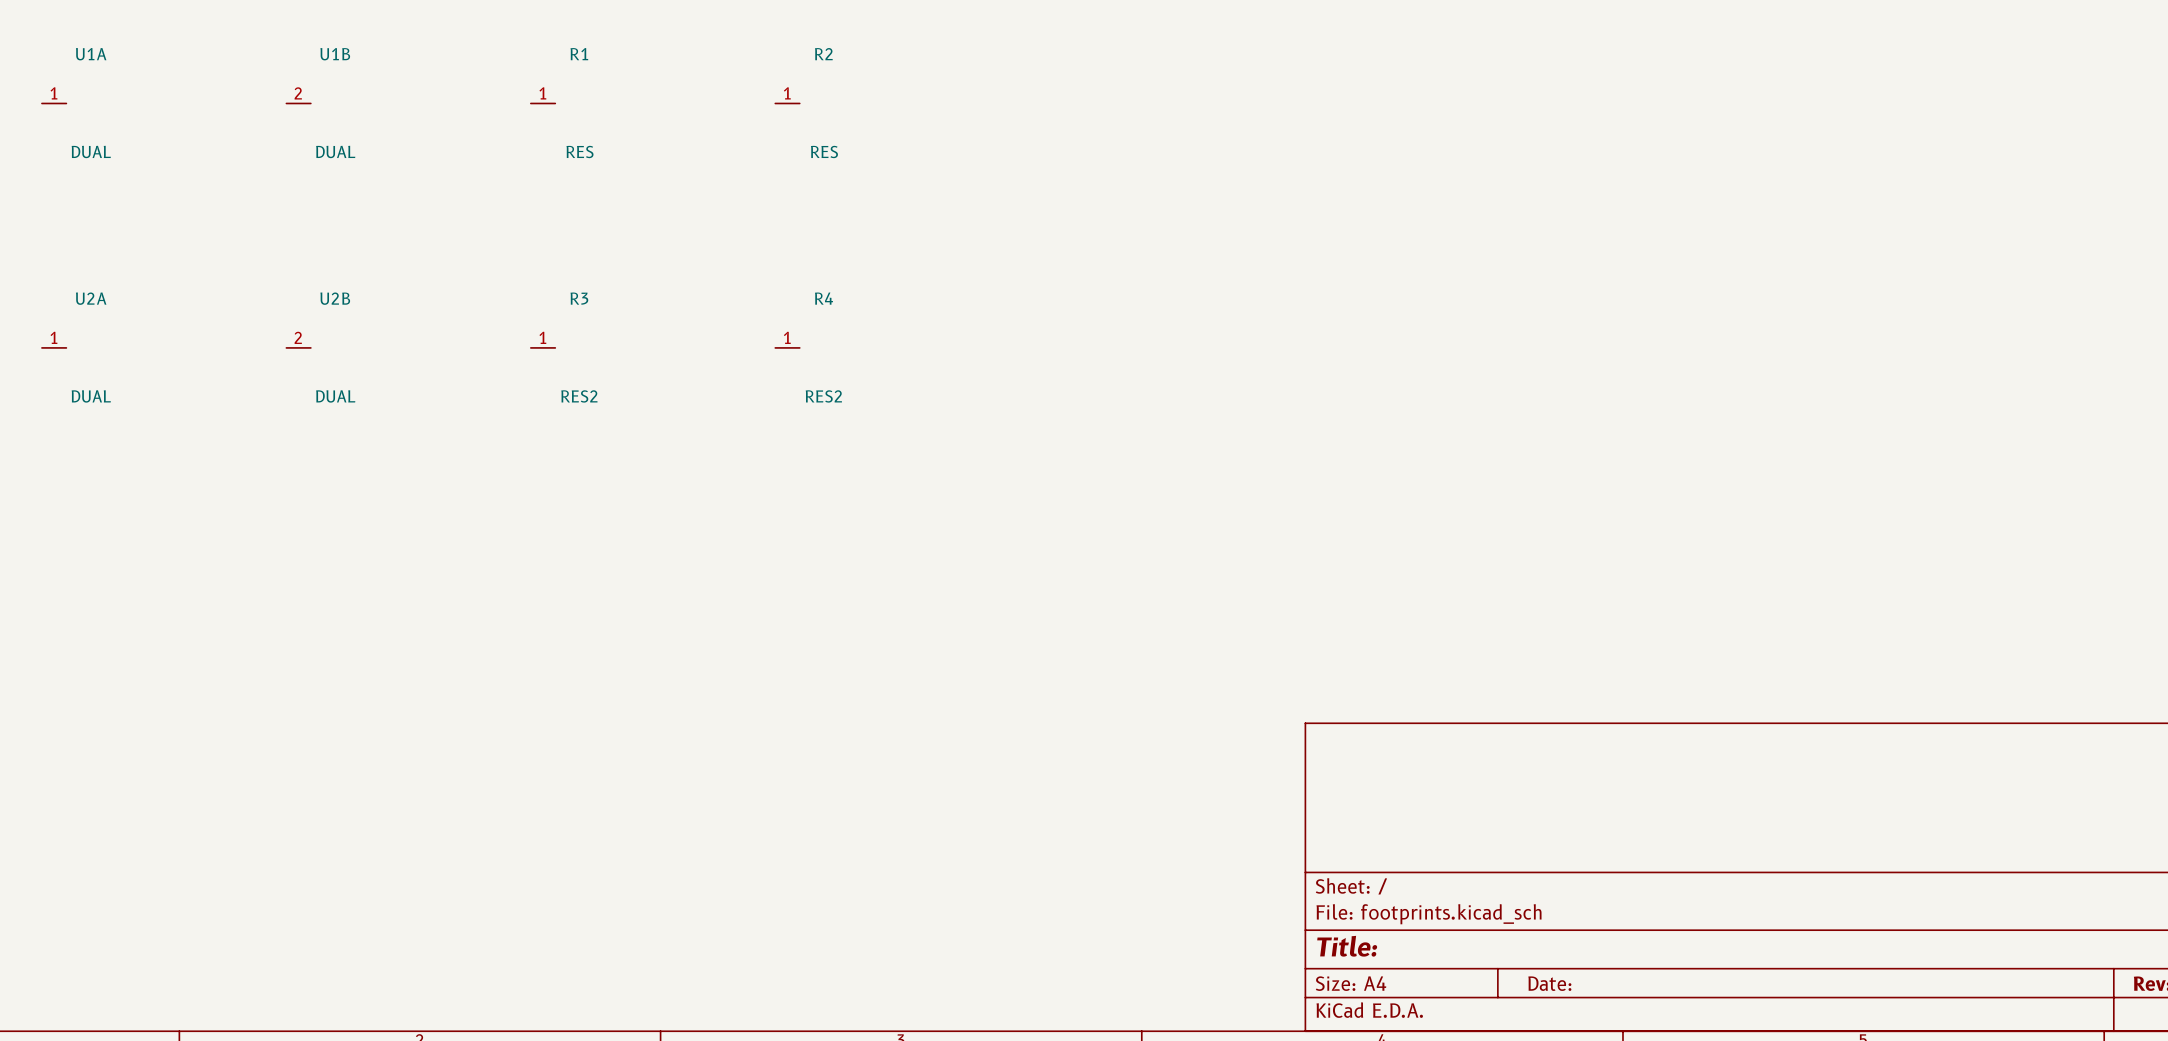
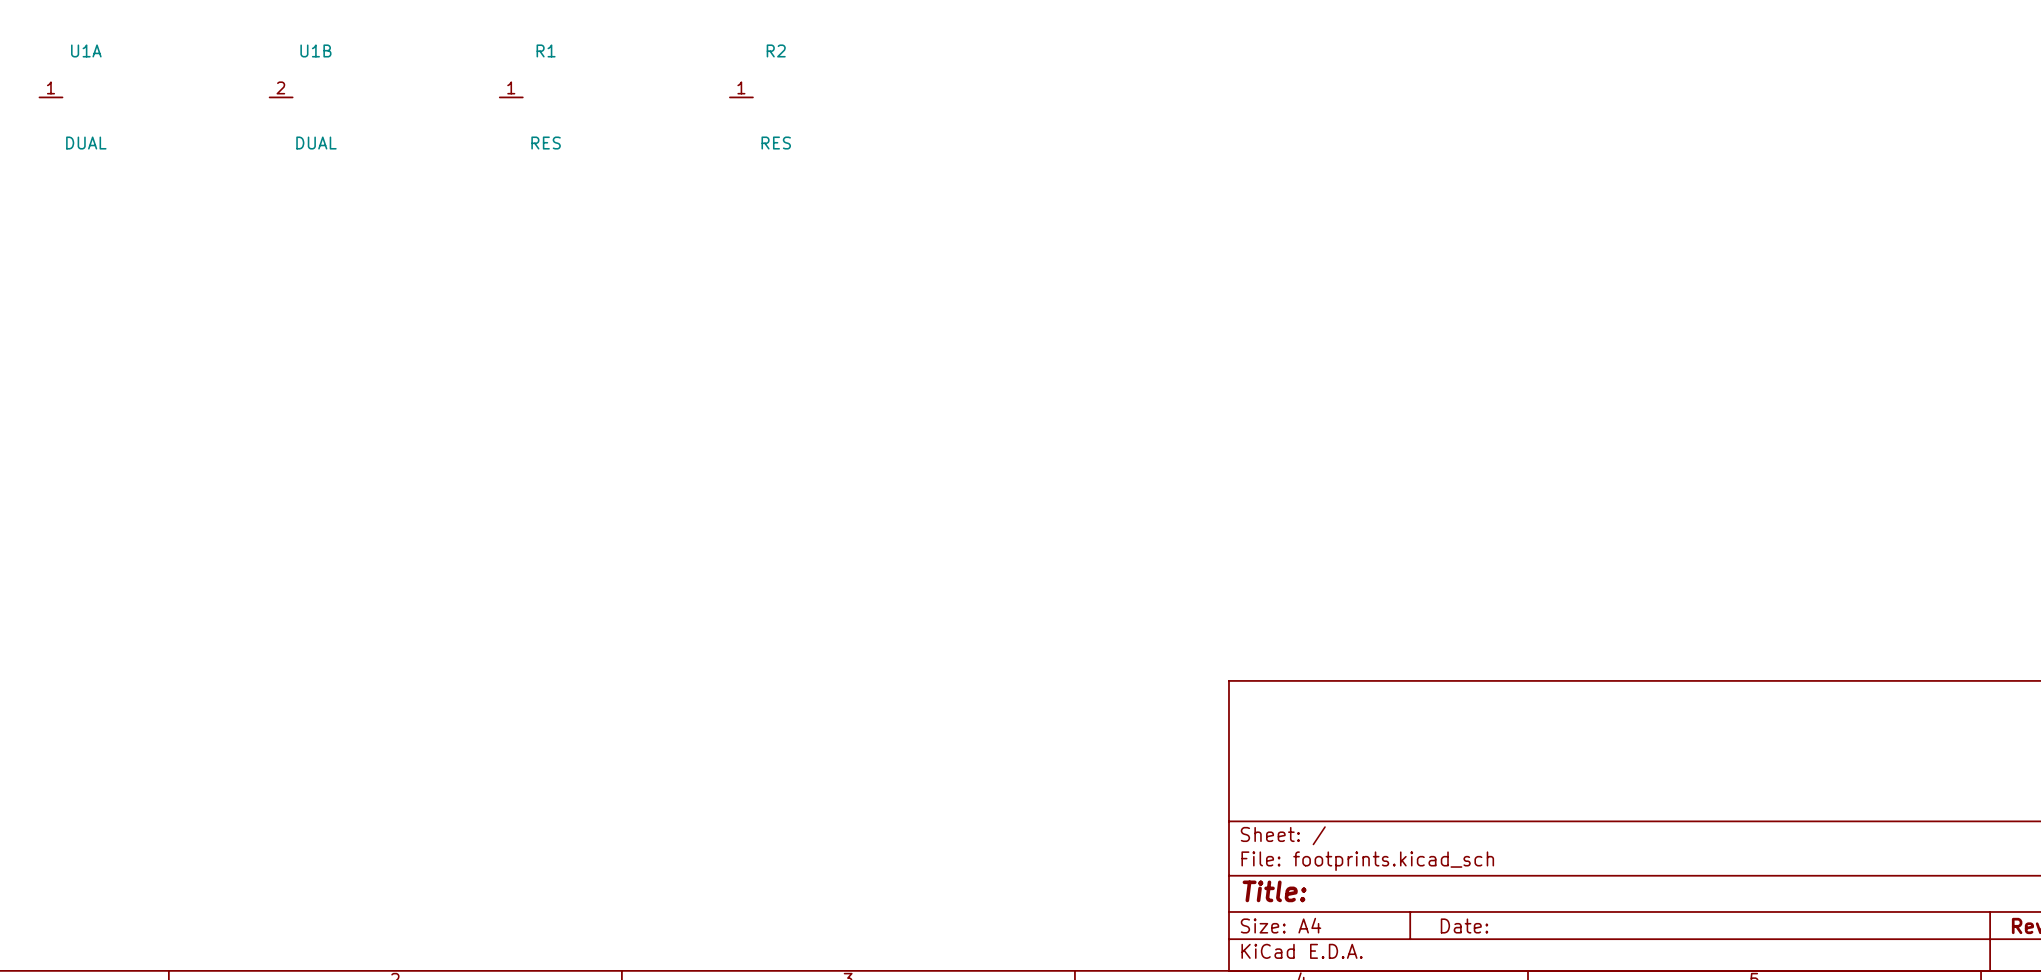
U2A: DUAL (54, 347) -> none
U2B: DUAL (298, 347) -> none
R3: RES2 (543, 347) -> none
R4: RES2 (787, 347) -> none

